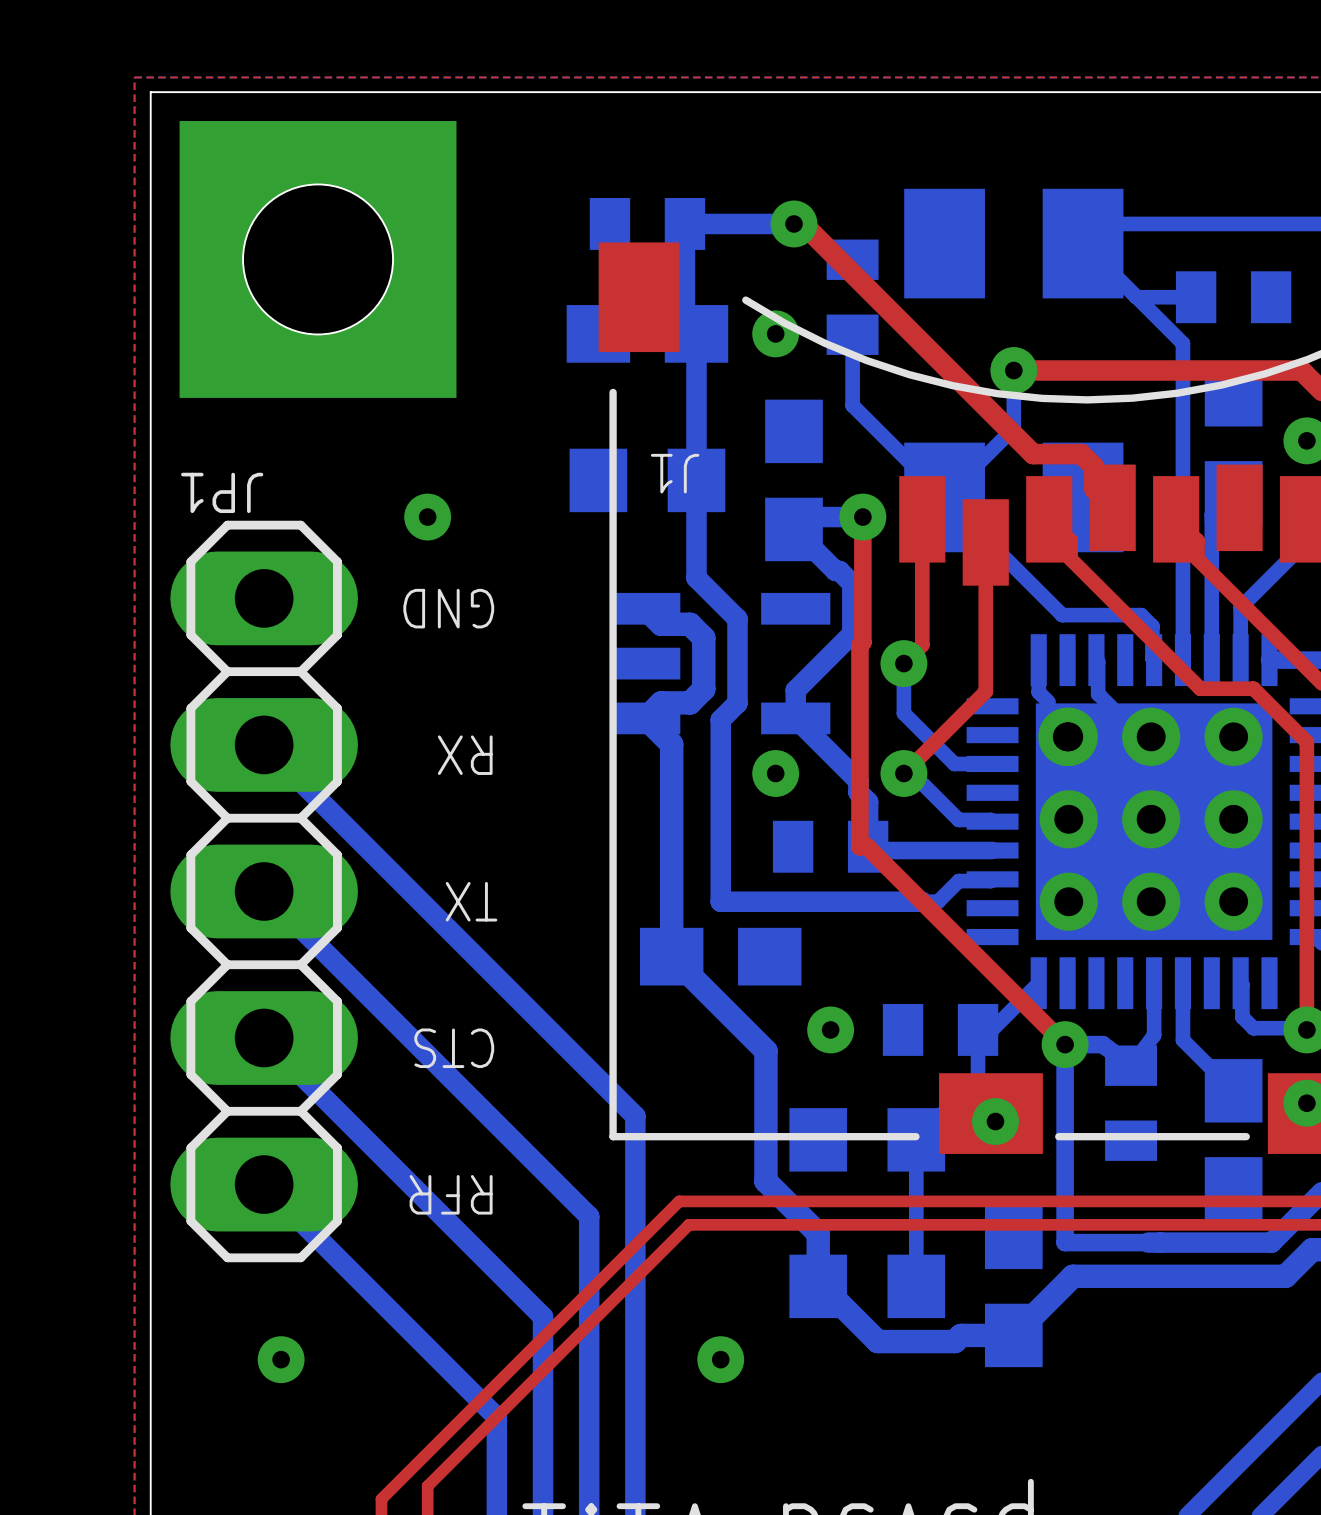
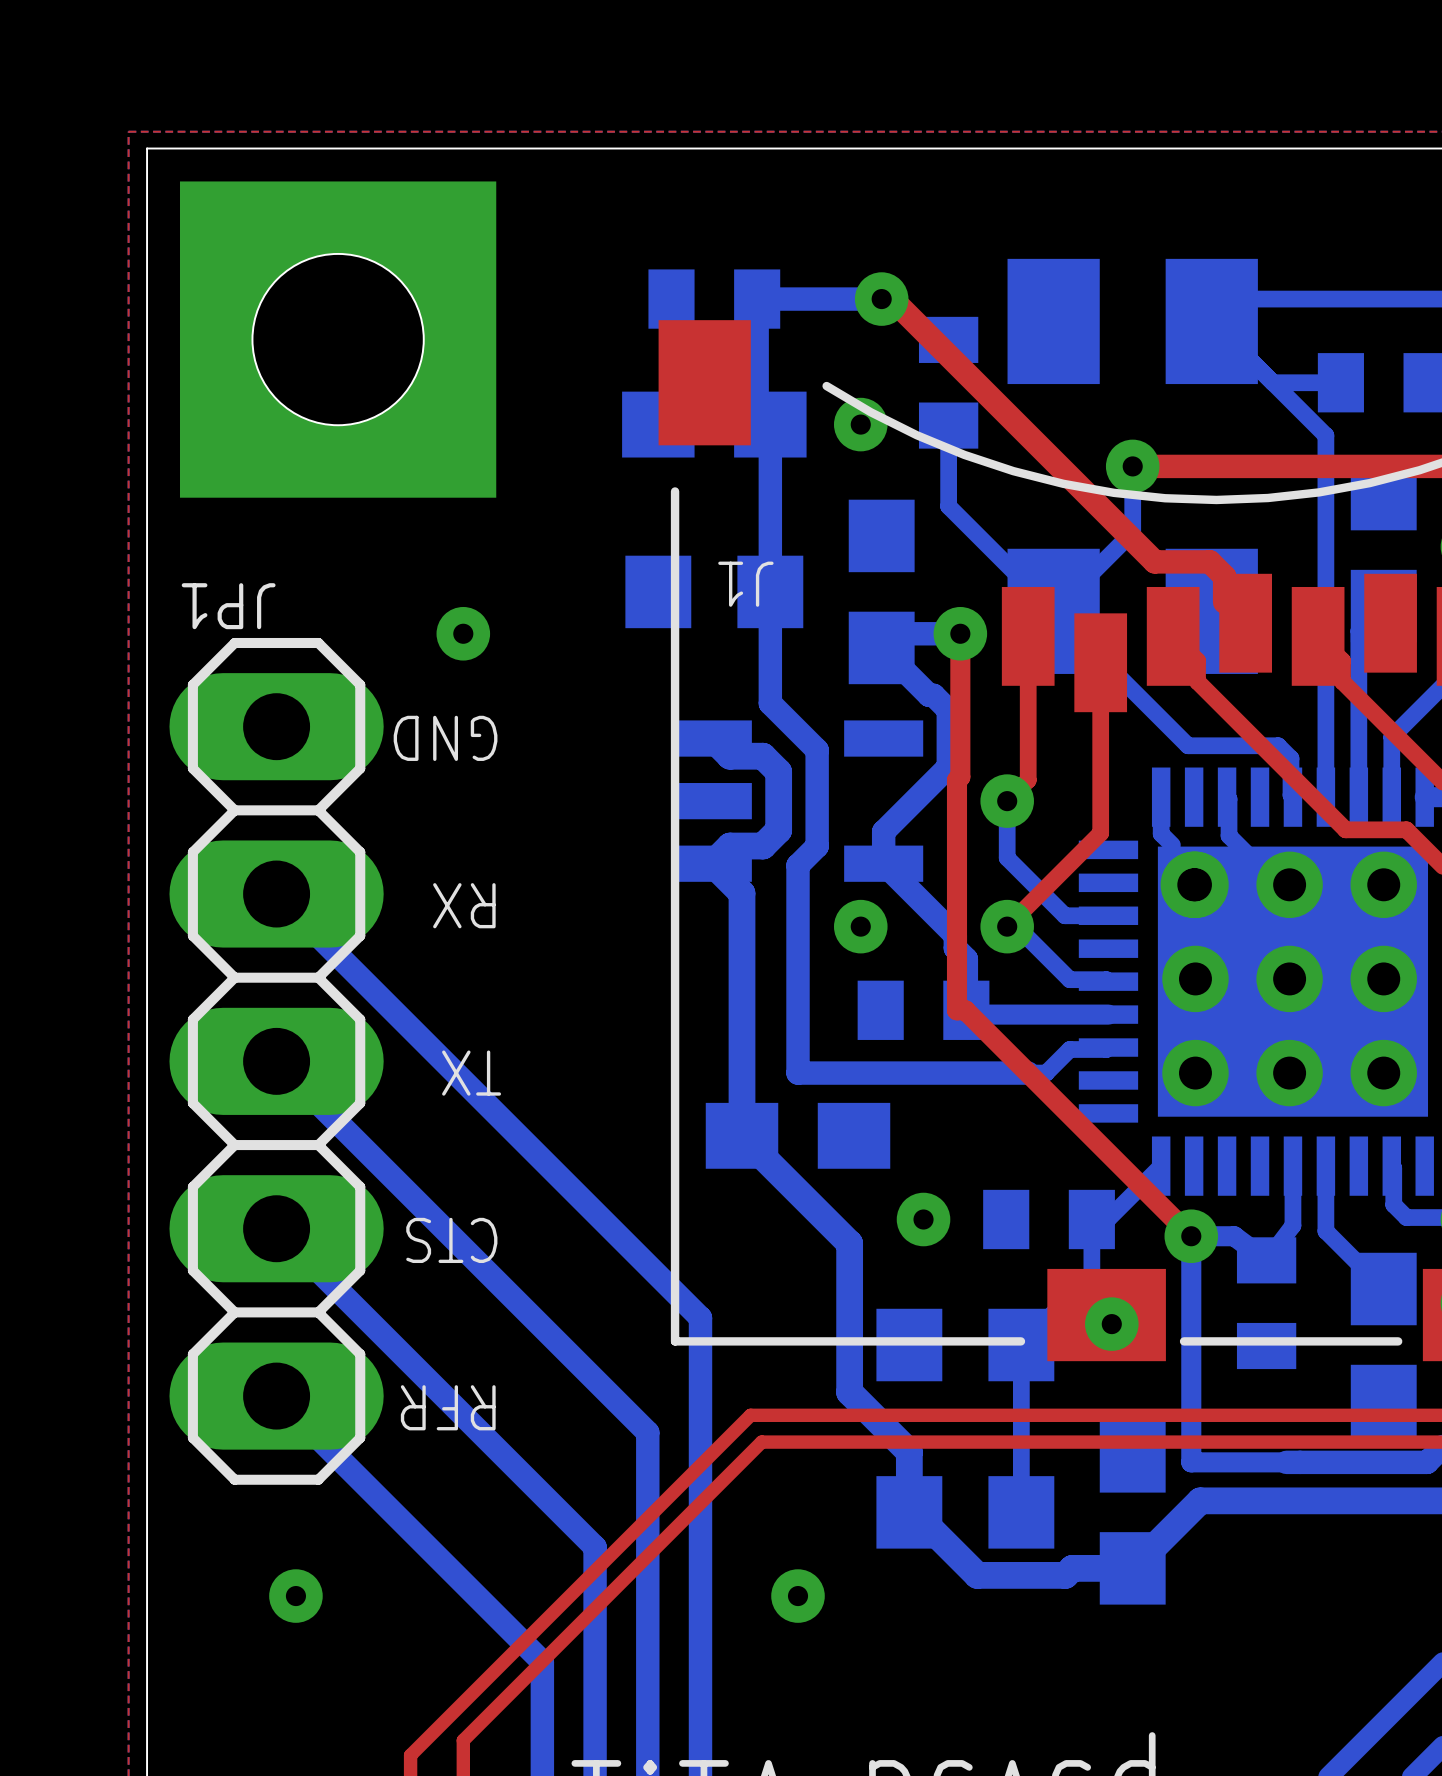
text position: GND (448, 608) -> GND (445, 738)
text position: RX (465, 755) -> RX (464, 905)
text position: TX (471, 901) -> TX (471, 1073)
text position: CTS (454, 1048) -> CTS (451, 1240)
text position: RFR (451, 1194) -> RFR (448, 1407)

